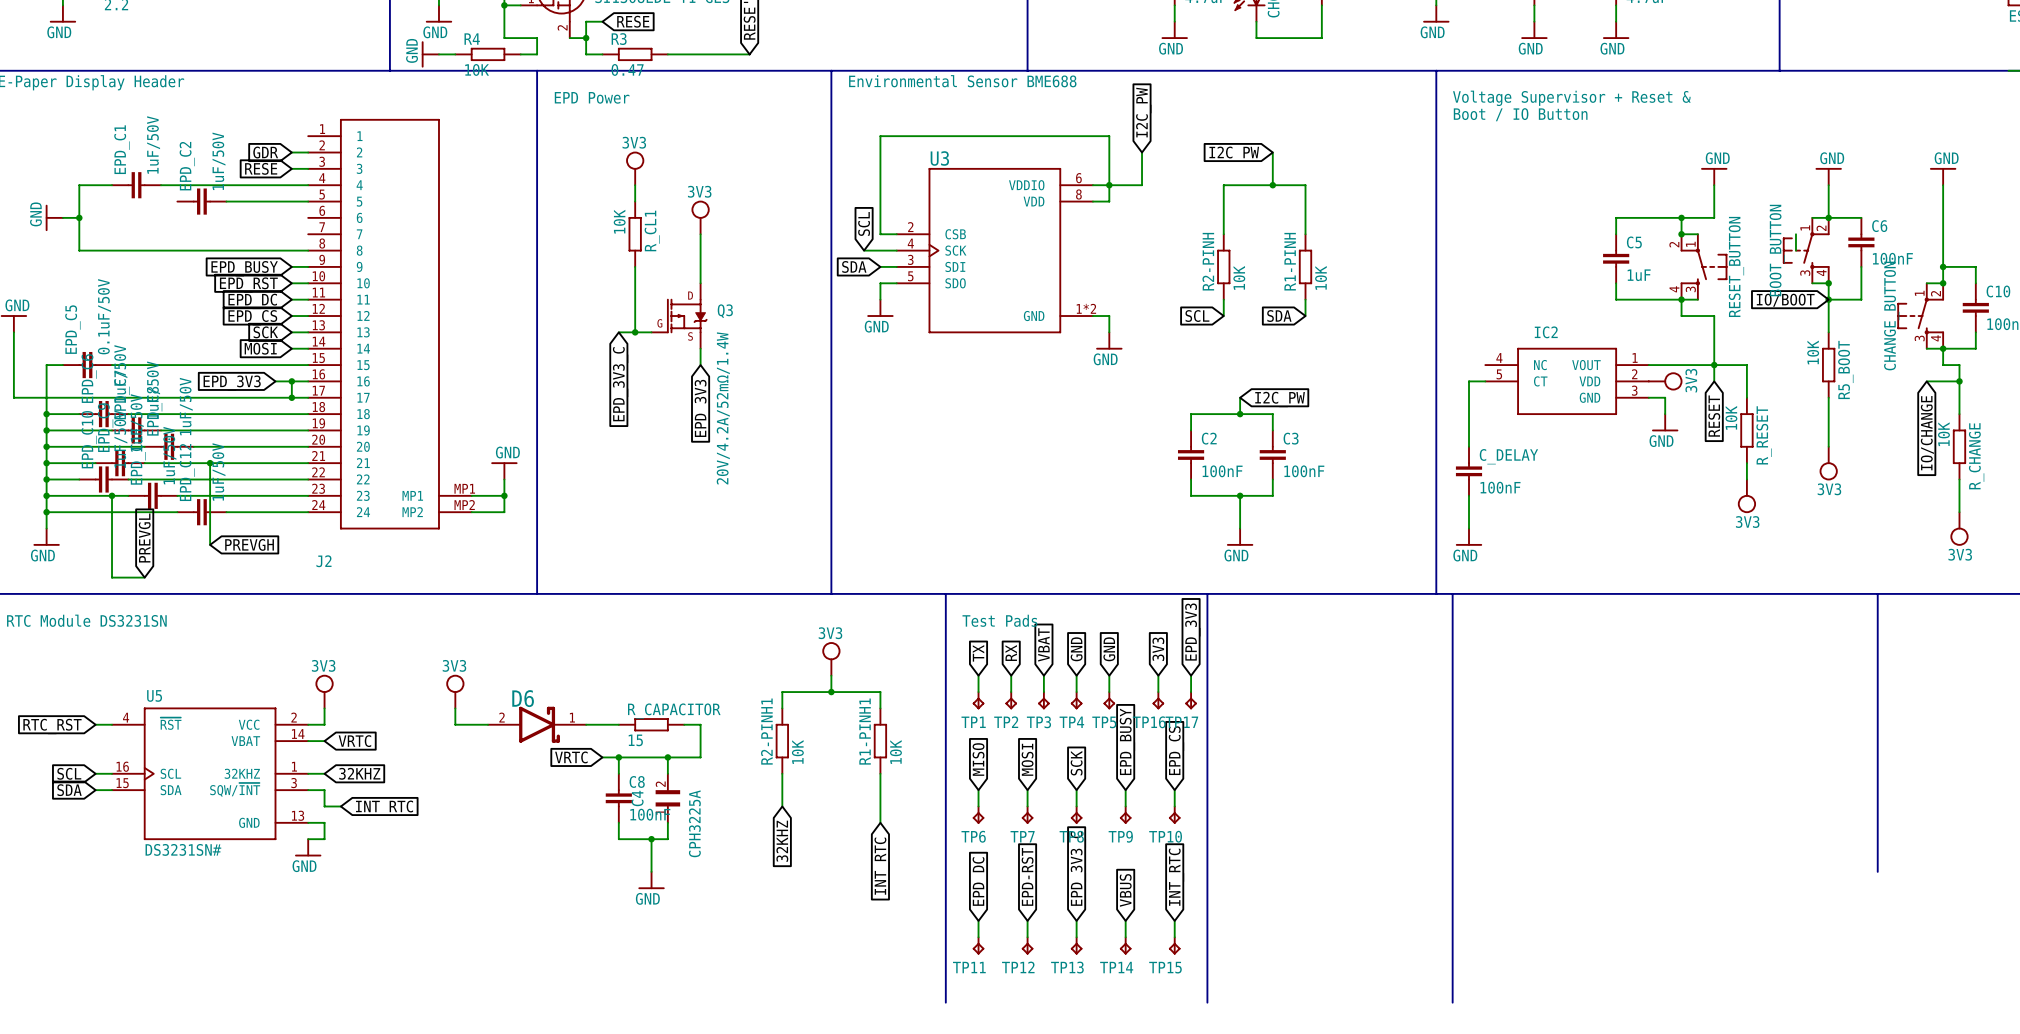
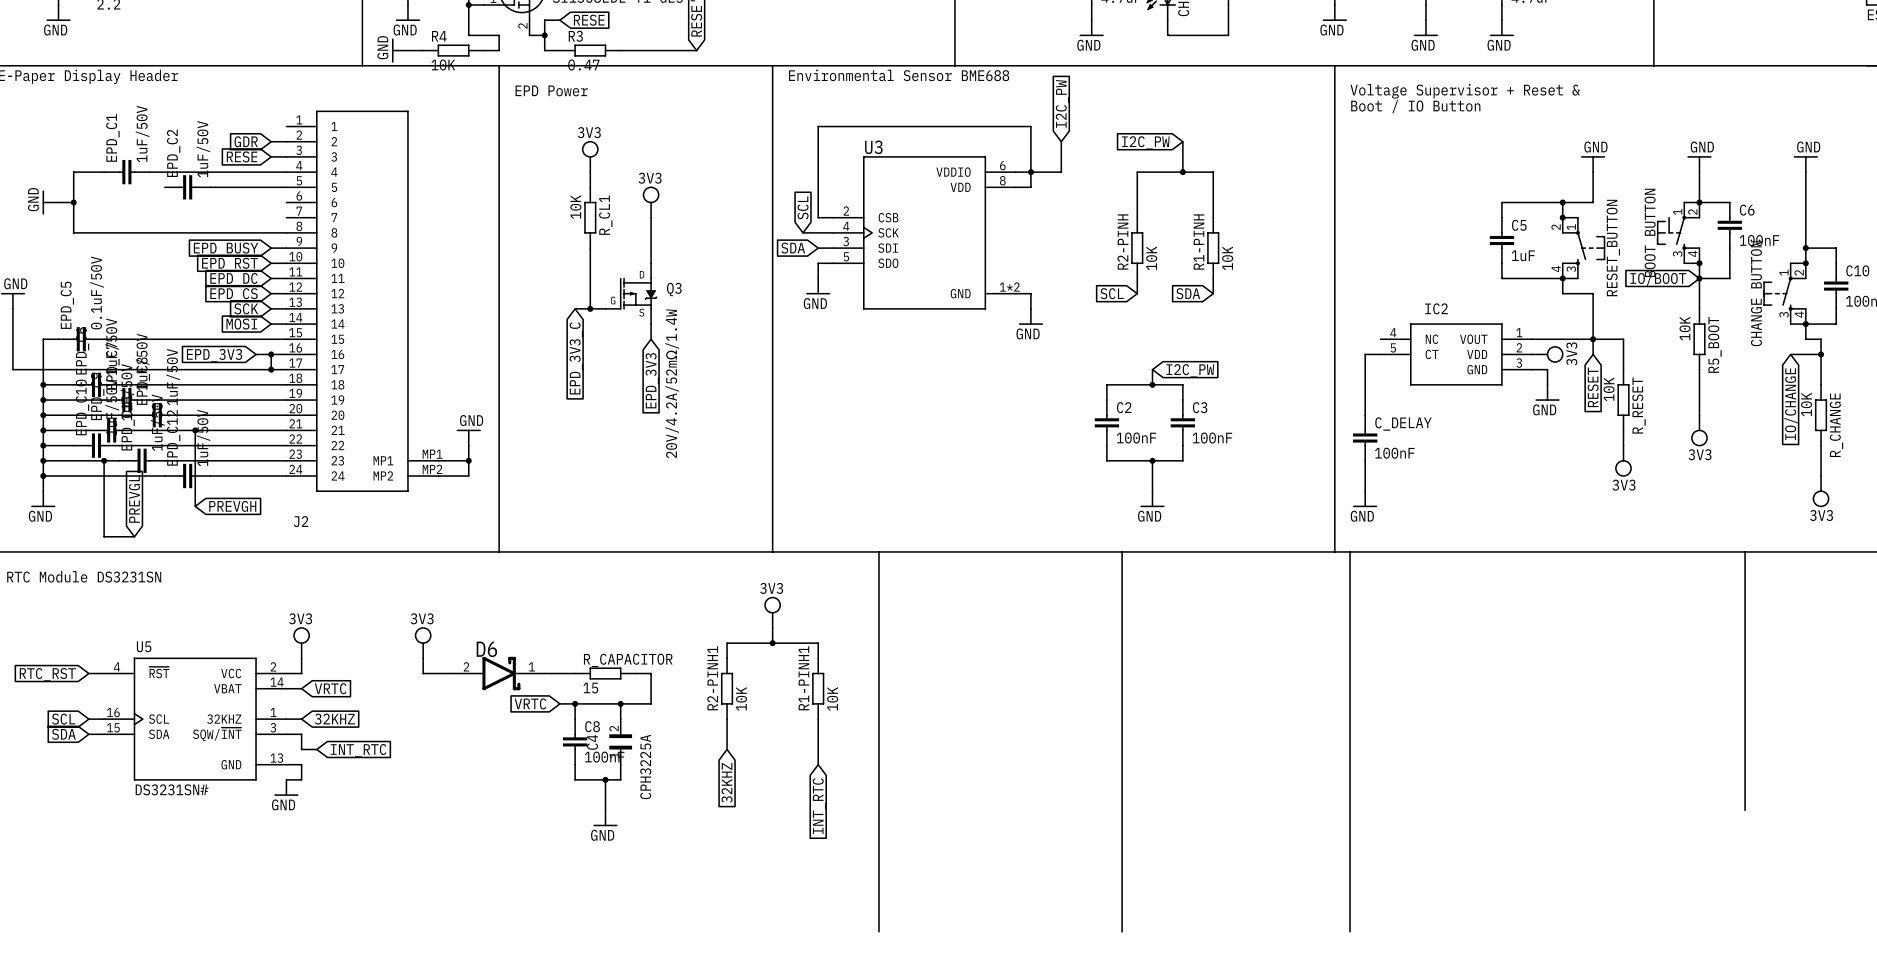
text: Test Pads (999, 620) -> none
global label: EPD_3V3 (1192, 632) -> none
global label: VBAT (1043, 644) -> none
global label: GND (1076, 649) -> none
global label: GND (1109, 649) -> none
global label: 3V3 (1158, 649) -> none
global label: TX (978, 653) -> none
global label: RX (1011, 653) -> none
wire: (978, 675) (978, 692) -> none
wire: (1011, 675) (1011, 692) -> none
wire: (1043, 675) (1043, 692) -> none
wire: (1076, 675) (1076, 692) -> none
wire: (1109, 675) (1109, 692) -> none
wire: (1158, 675) (1158, 692) -> none
wire: (1191, 675) (1191, 692) -> none
TP1: (978, 700) -> none
TP2: (1011, 700) -> none
TP3: (1043, 700) -> none
TP4: (1076, 700) -> none
TP5: (1109, 700) -> none
TP16: (1158, 700) -> none
TP17: (1191, 700) -> none
global label: EPD_BUSY (1127, 741) -> none
global label: EPD_CS (1176, 750) -> none
global label: MISO (978, 759) -> none
global label: MOSI (1027, 759) -> none
global label: SCK (1076, 763) -> none
wire: (978, 790) (978, 806) -> none
wire: (1027, 790) (1027, 806) -> none
wire: (1076, 790) (1076, 806) -> none
wire: (1125, 790) (1125, 806) -> none
wire: (1174, 790) (1174, 806) -> none
TP6: (978, 815) -> none
TP7: (1027, 815) -> none
TP8: (1076, 815) -> none
TP9: (1125, 815) -> none
TP10: (1174, 815) -> none
global label: EPD_3V3_C (1078, 868) -> none
global label: EPD-RST (1027, 876) -> none
global label: INT_RTC (1176, 877) -> none
global label: EPD_DC (980, 881) -> none
global label: VBUS (1125, 890) -> none
wire: (978, 920) (978, 937) -> none
wire: (1027, 920) (1027, 937) -> none
wire: (1076, 920) (1076, 937) -> none
wire: (1125, 920) (1125, 937) -> none
wire: (1174, 920) (1174, 937) -> none
TP11: (978, 945) -> none
TP12: (1027, 945) -> none
TP13: (1076, 945) -> none
TP14: (1125, 945) -> none
TP15: (1174, 945) -> none

